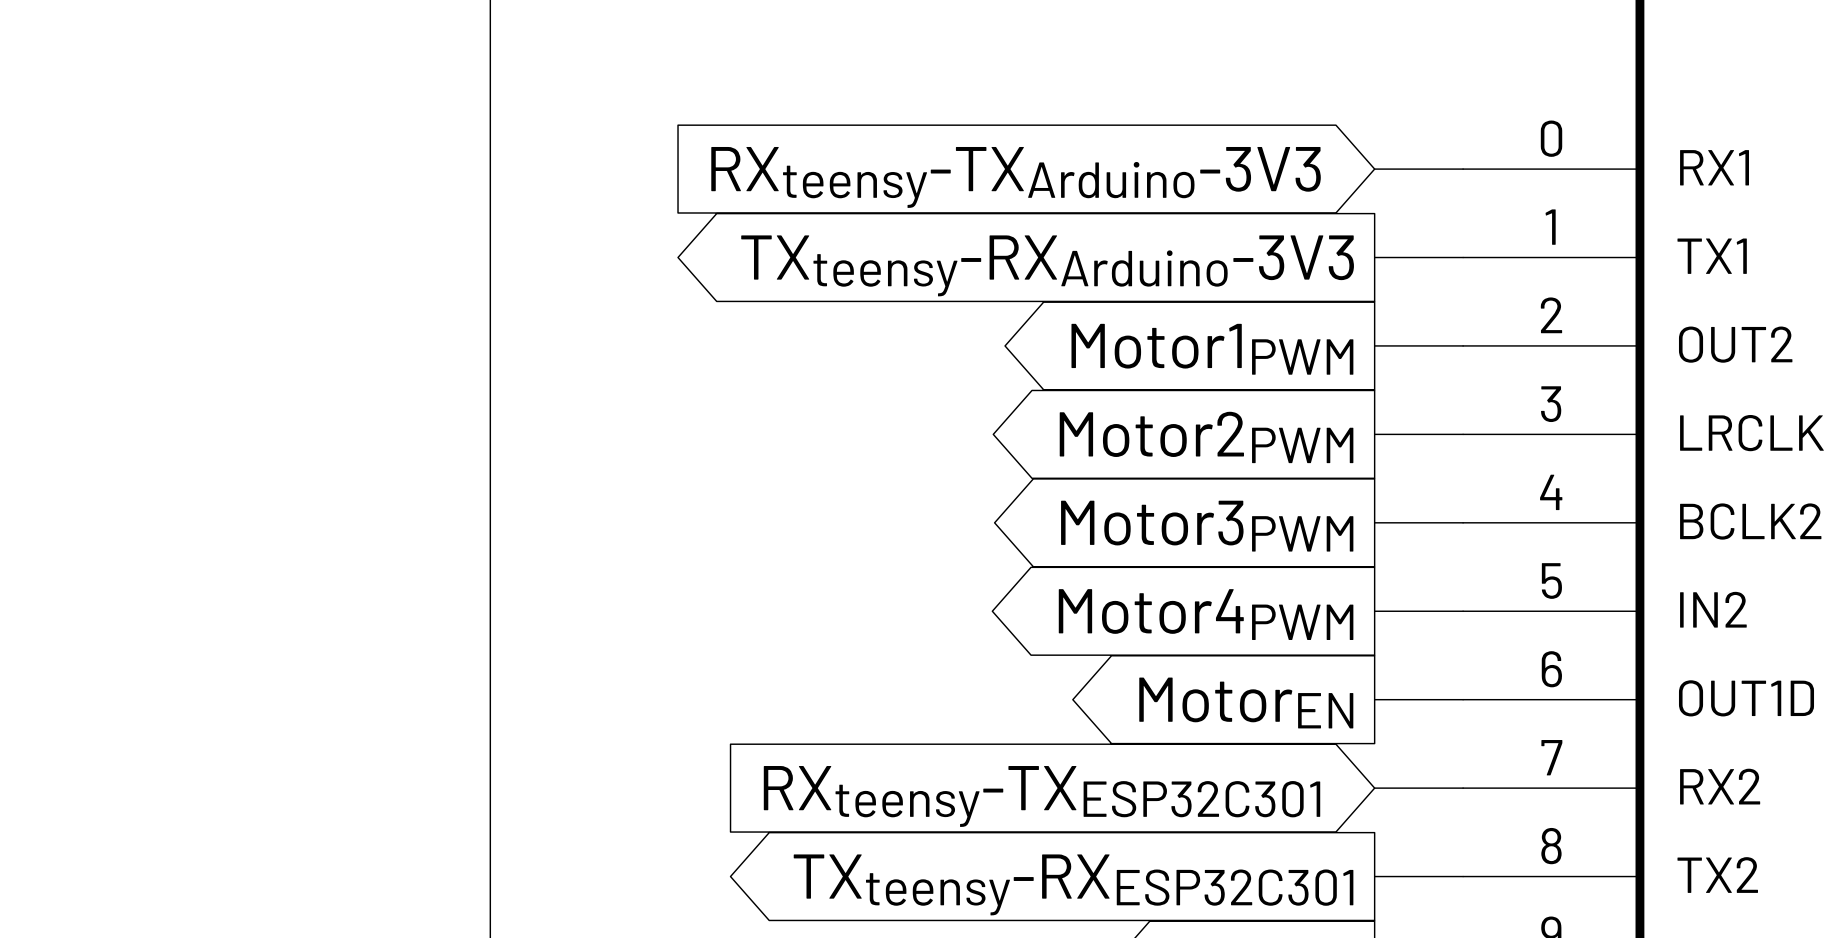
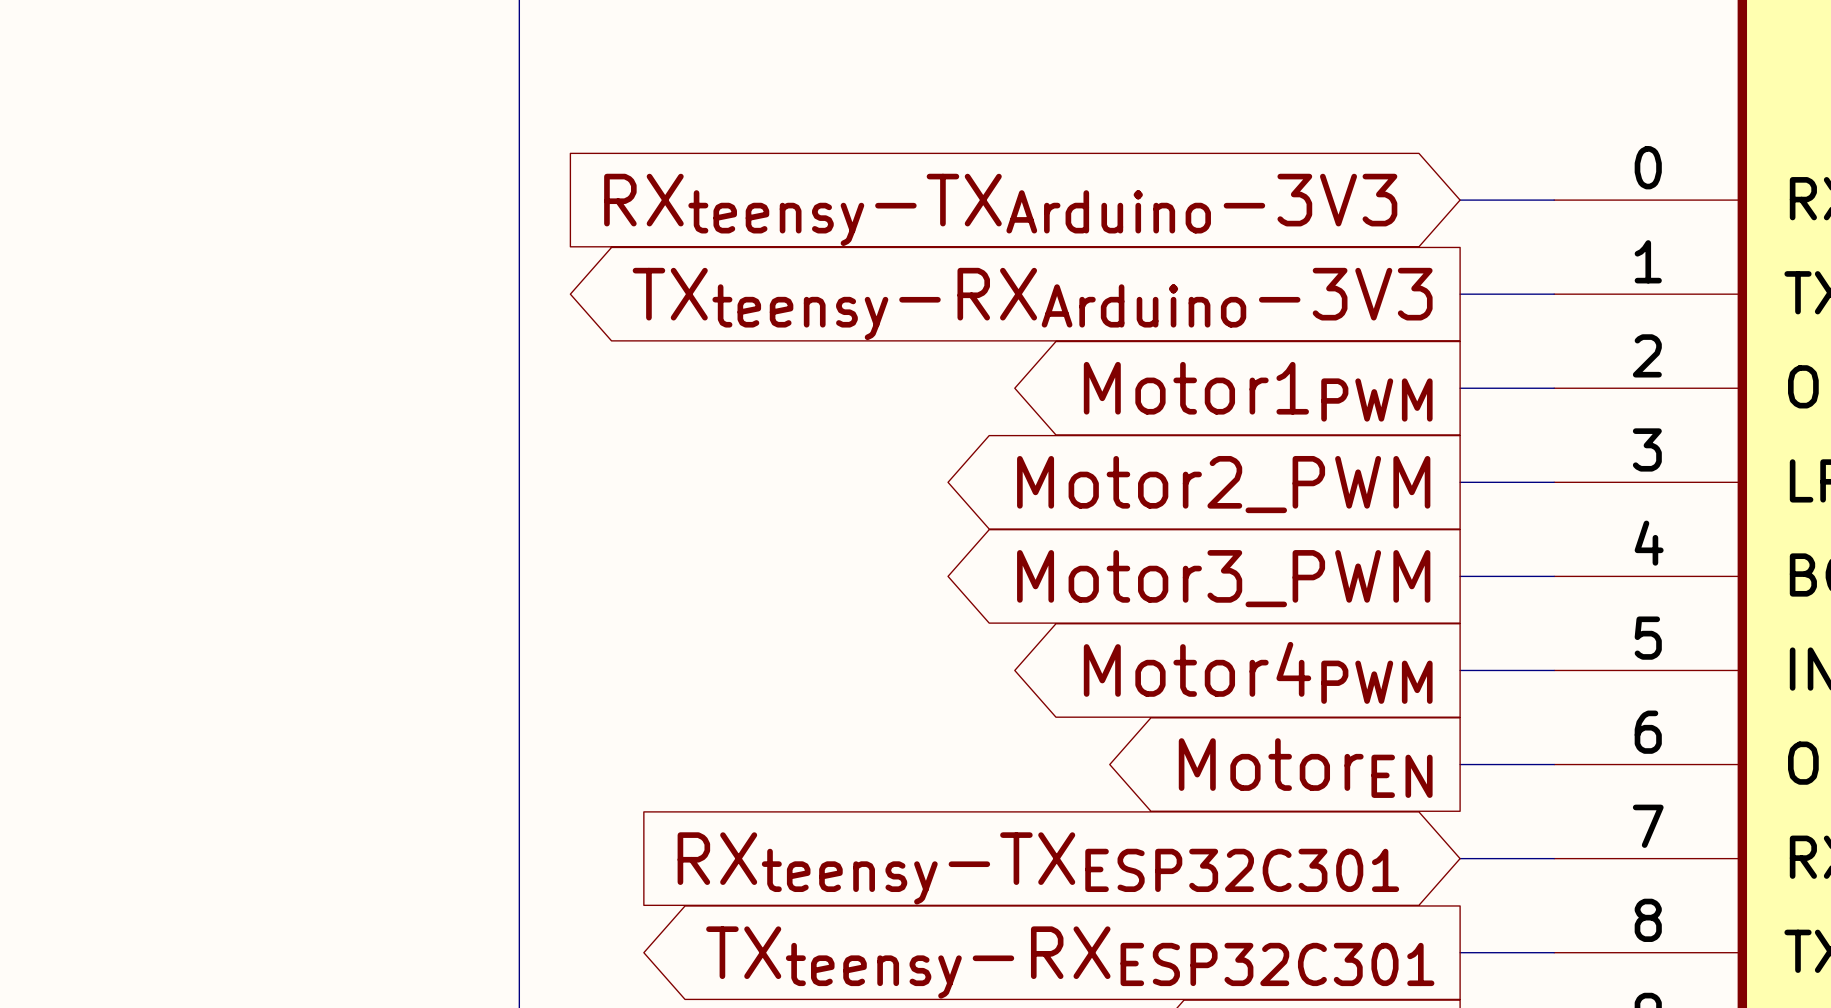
global label: Motor2PWM (1206, 437) -> Motor2_PWM (1223, 484)
global label: Motor3PWM (1207, 526) -> Motor3_PWM (1223, 578)

